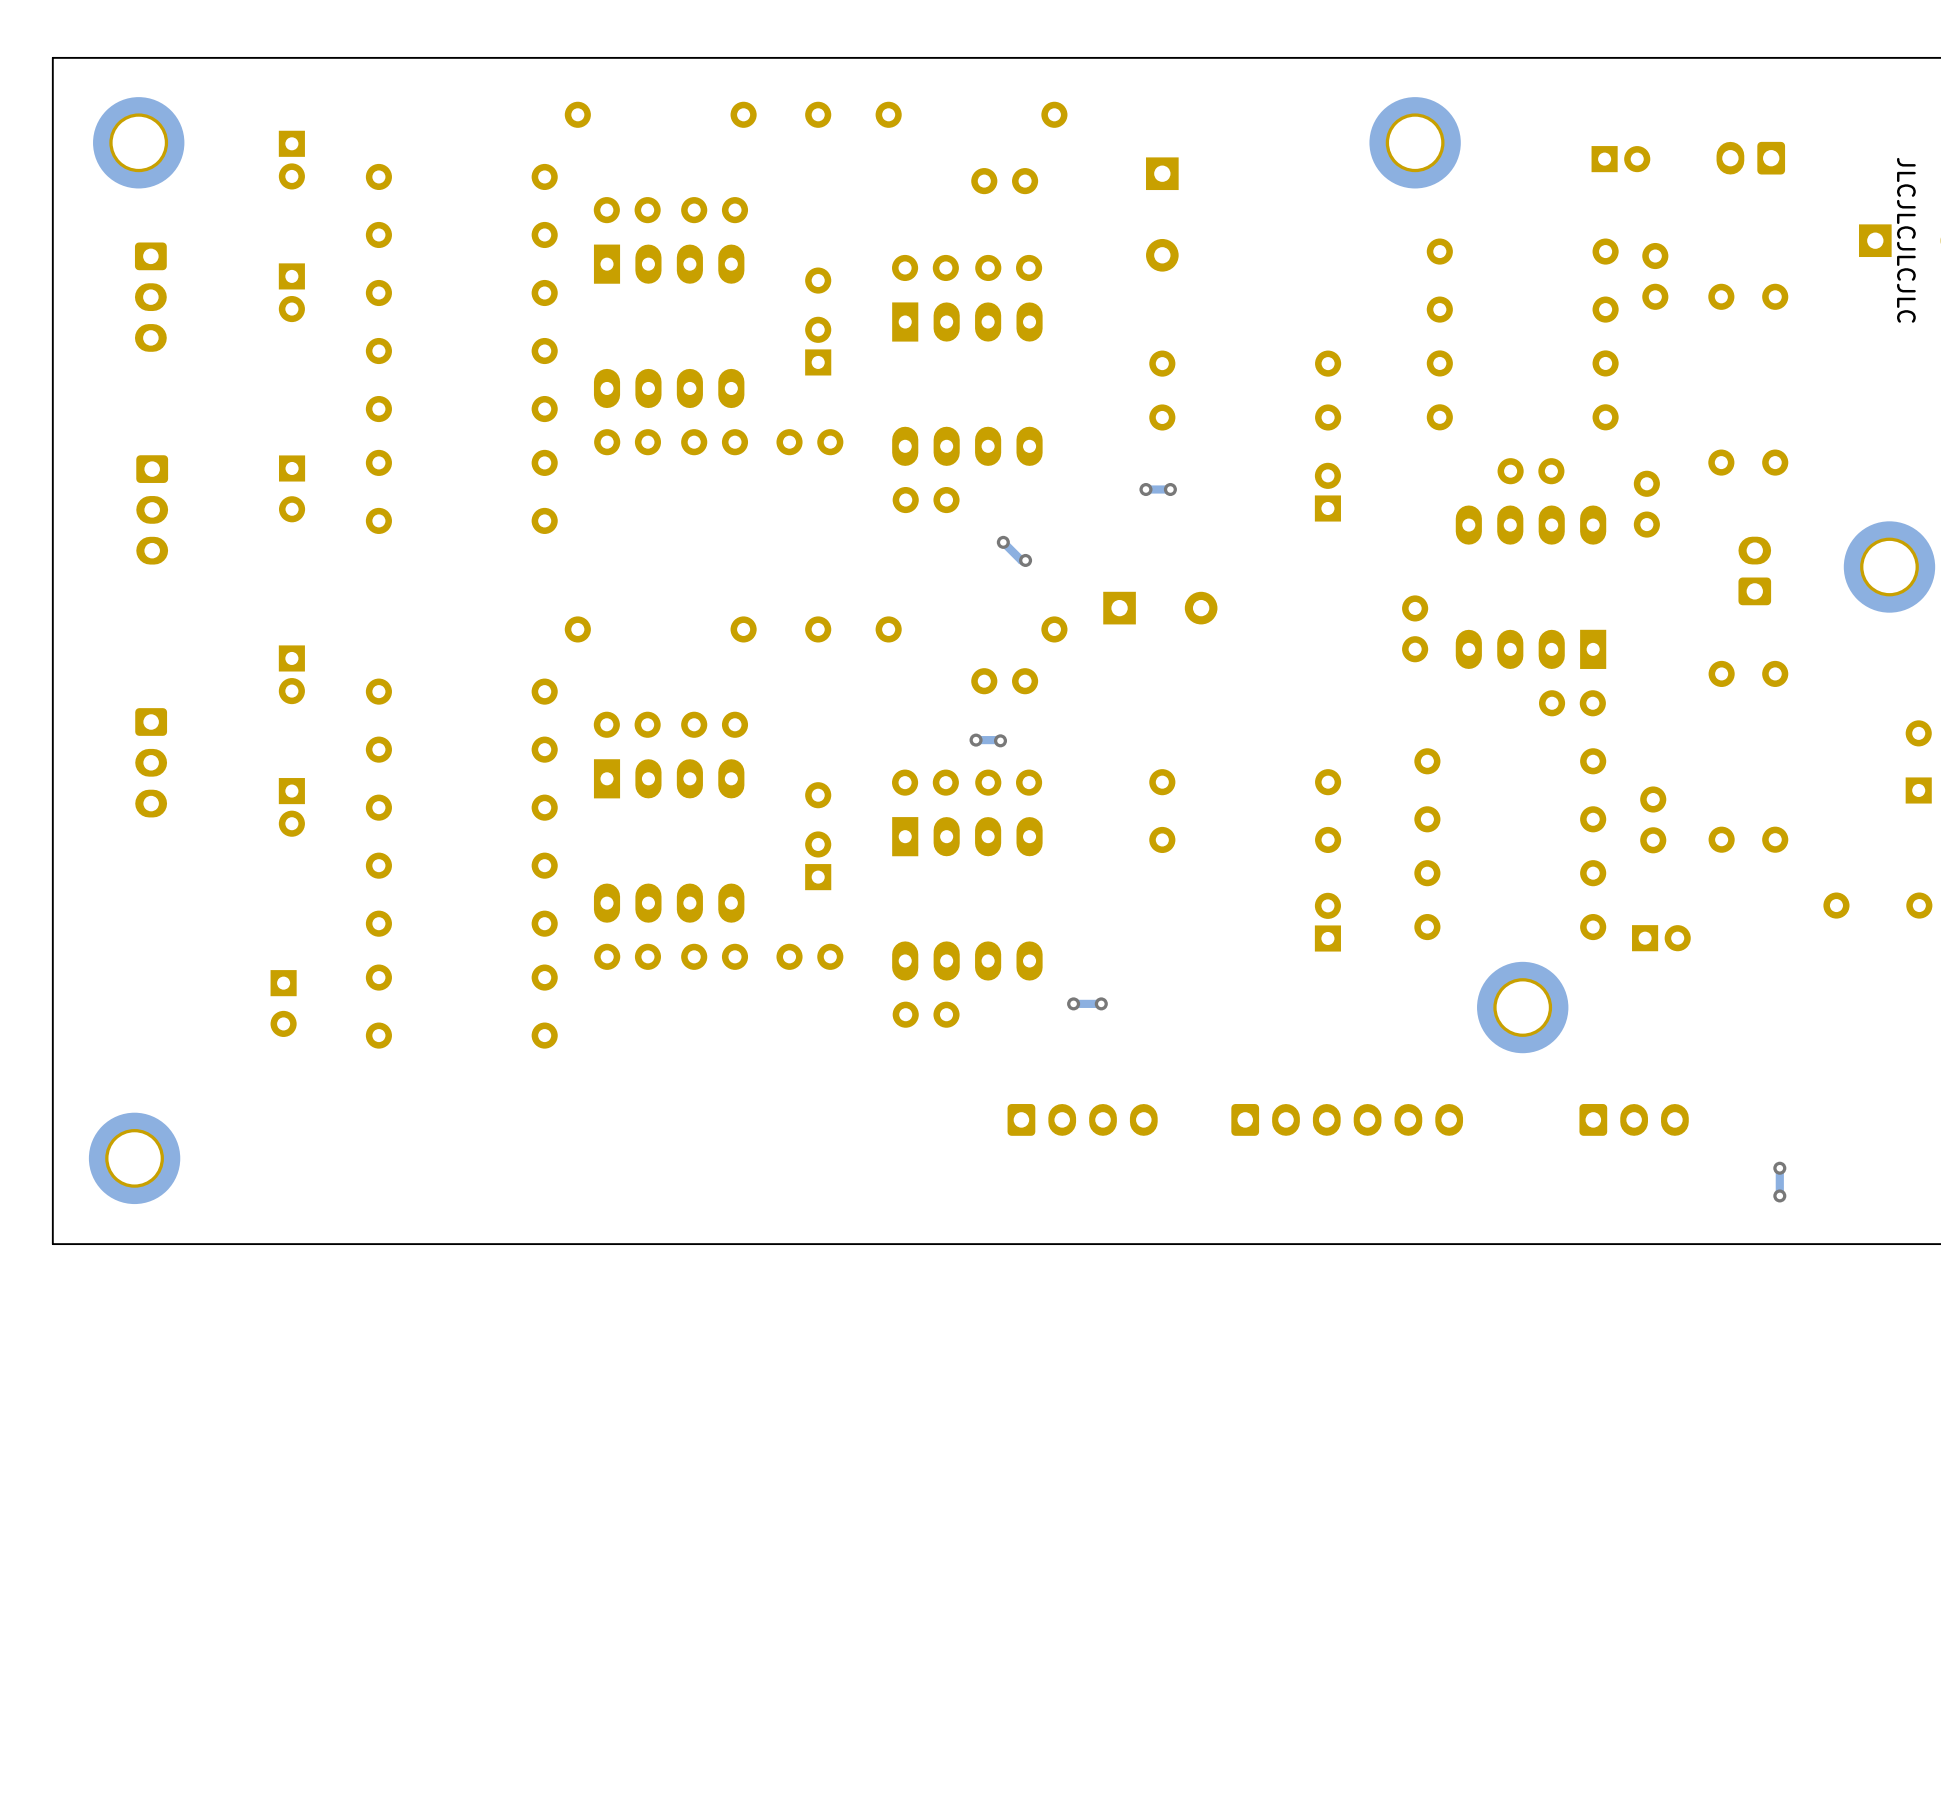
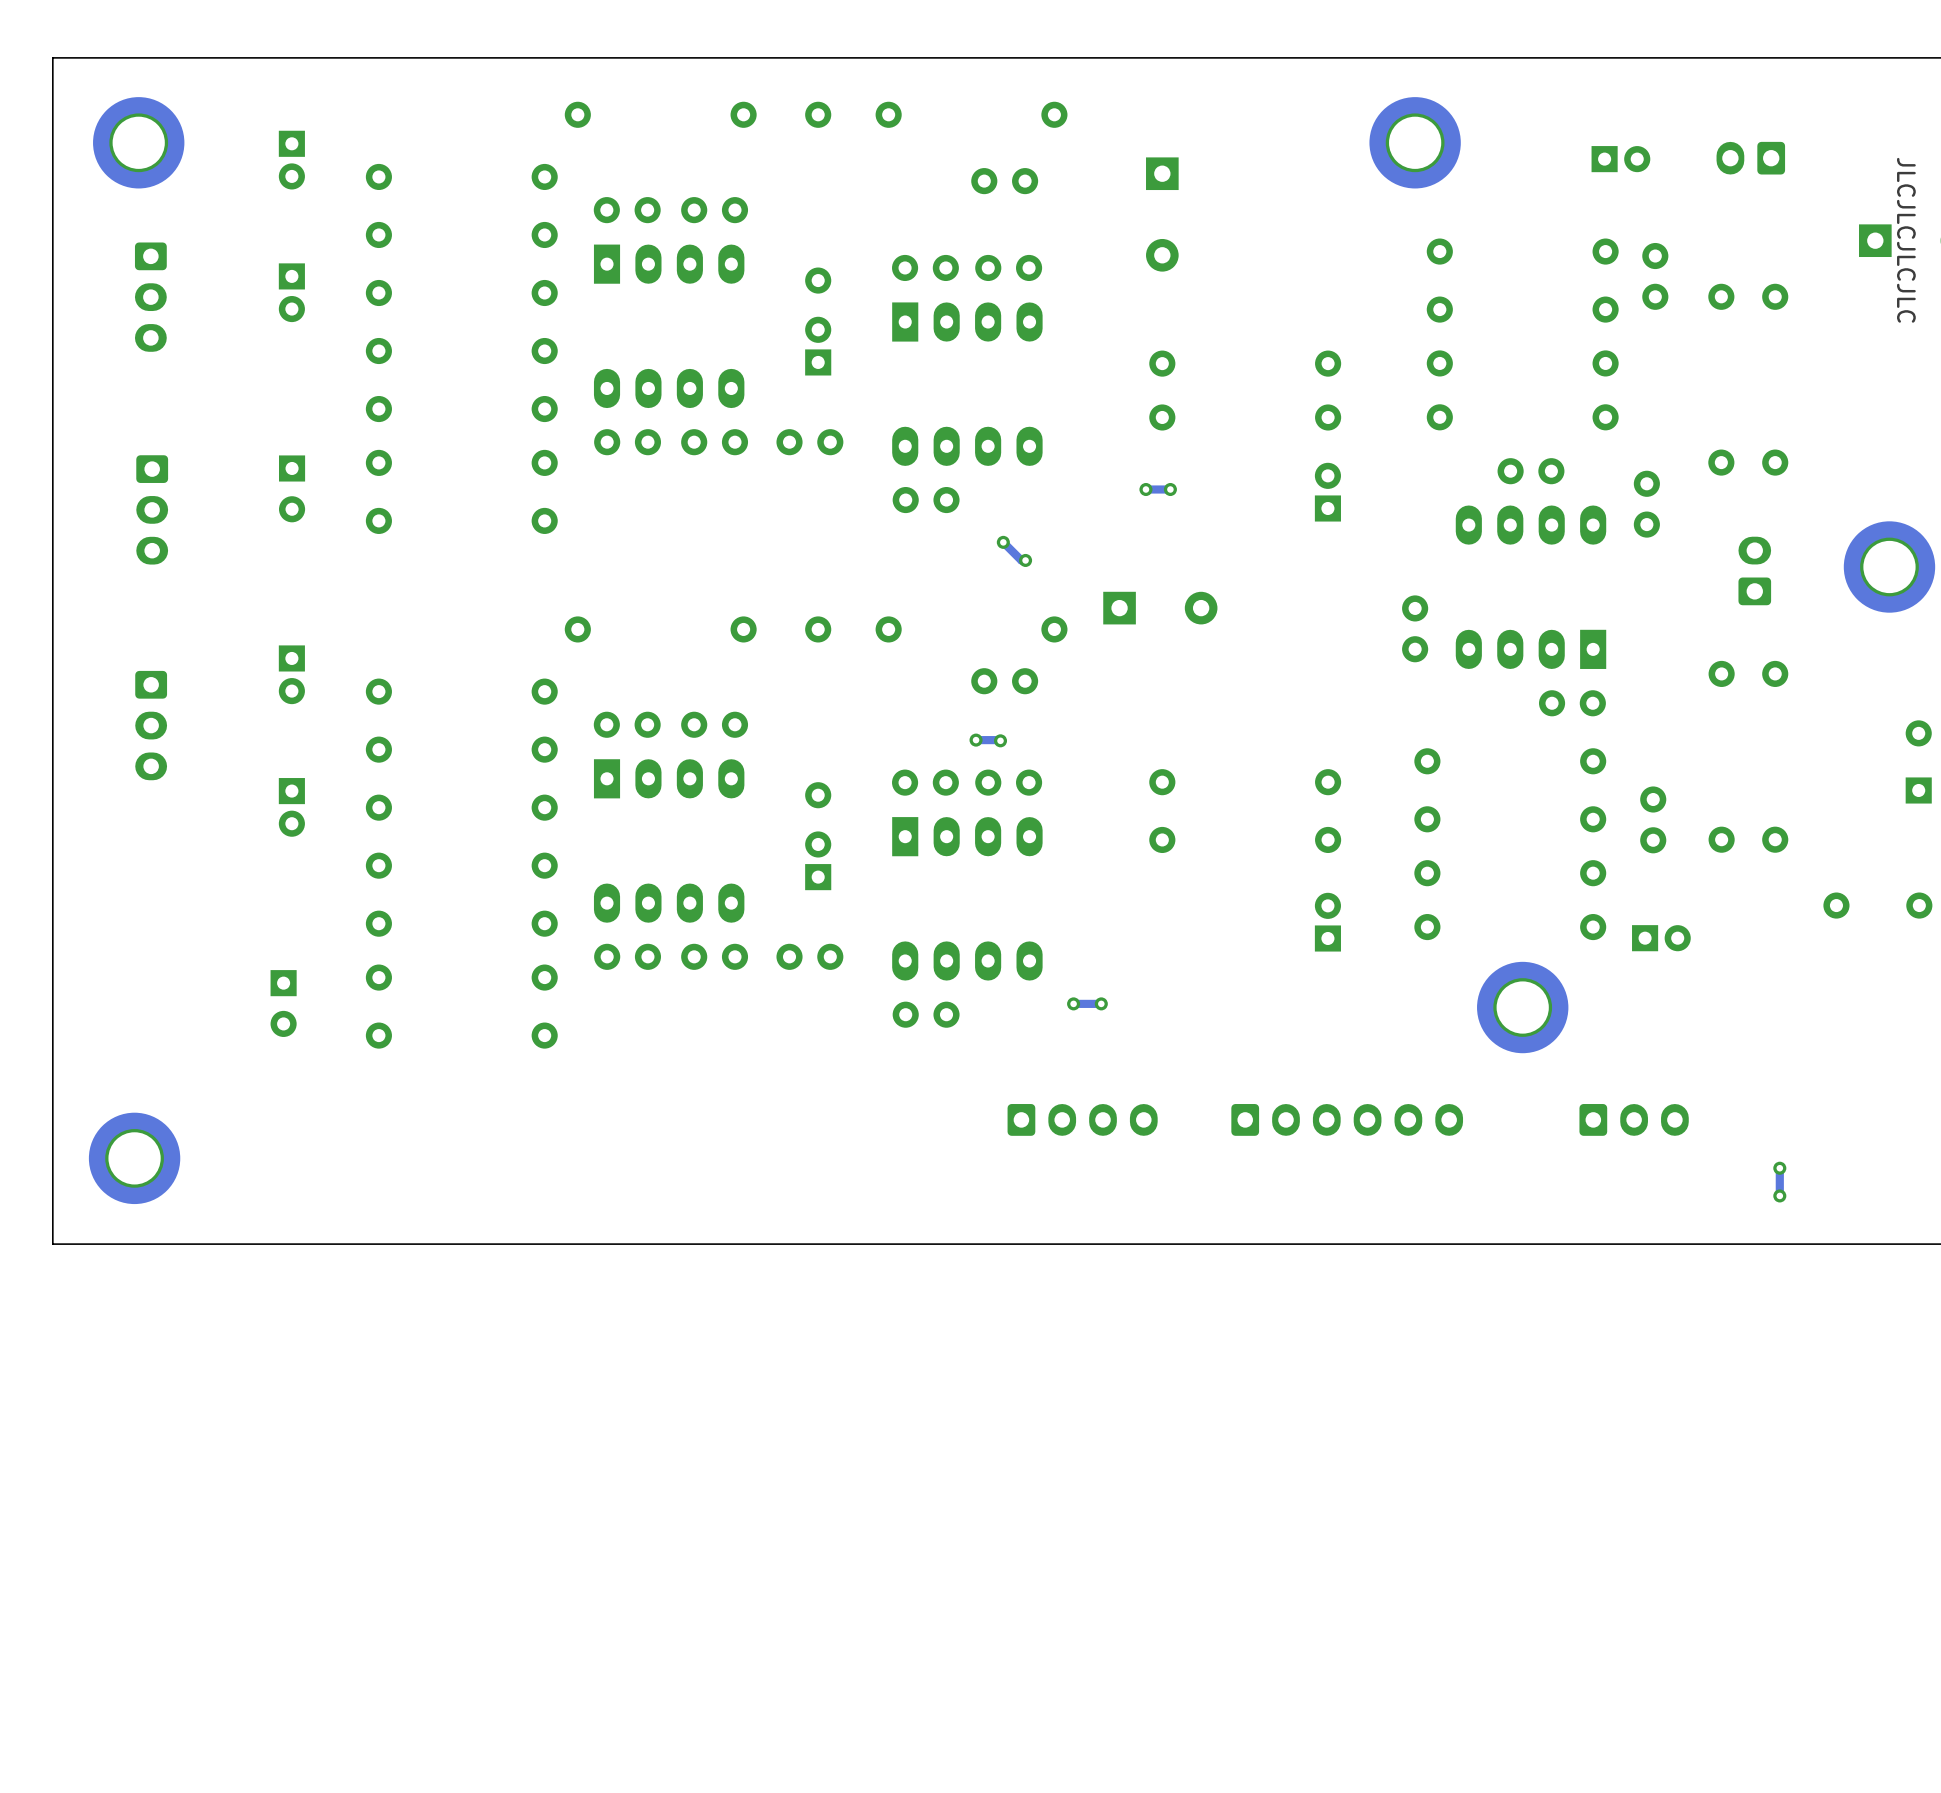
part position: (151, 762) -> (151, 725)

